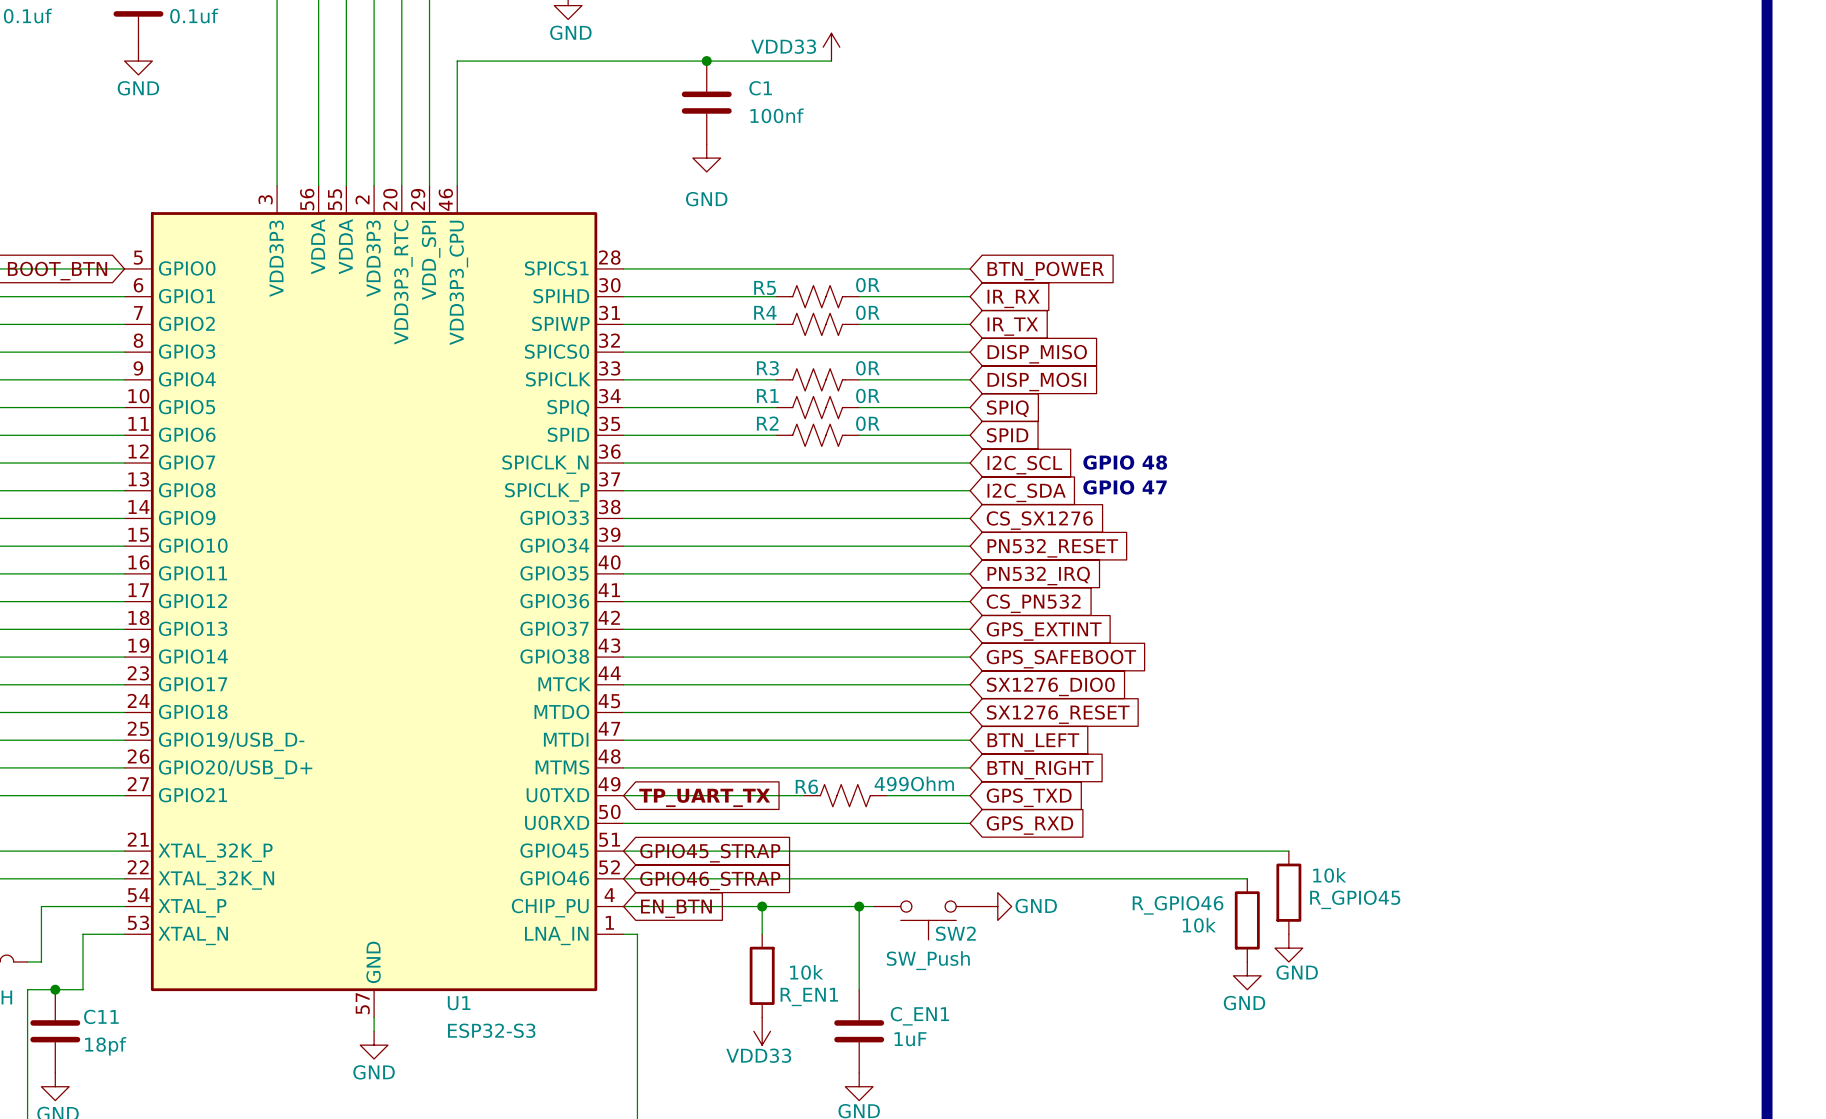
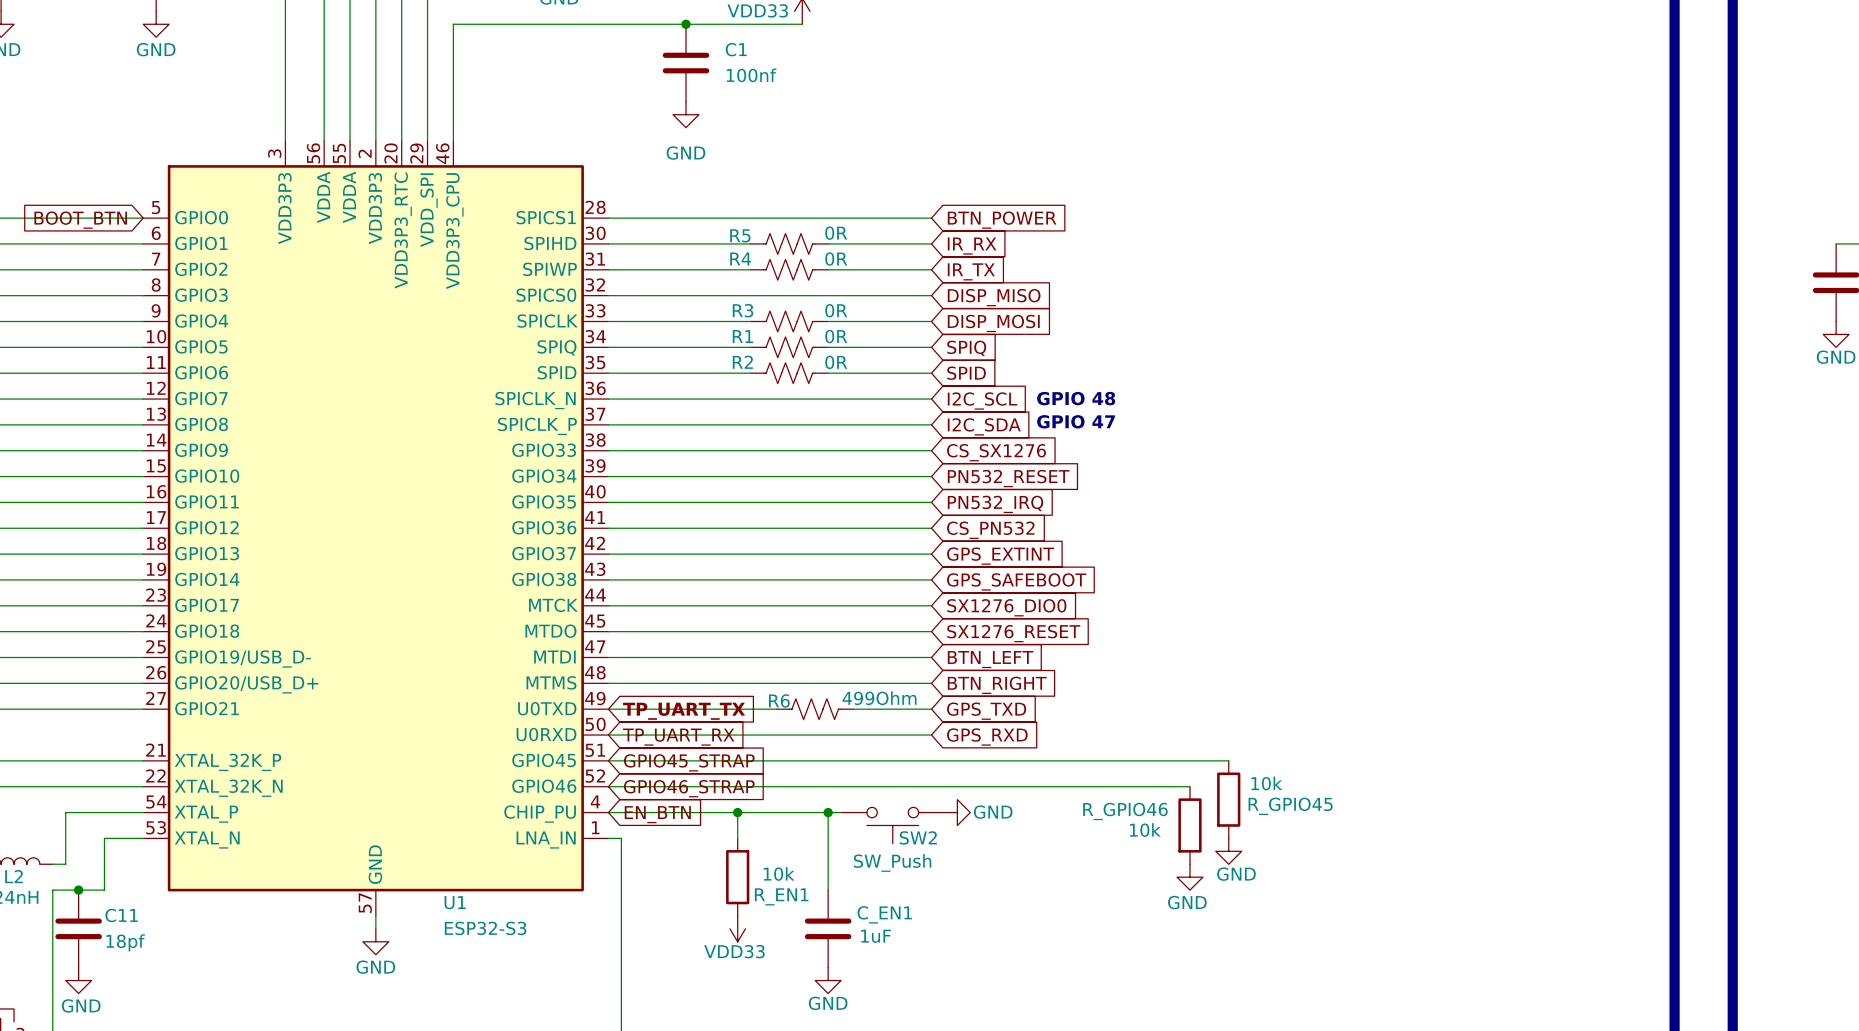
global label: none -> TP_UART_RX (678, 737)

